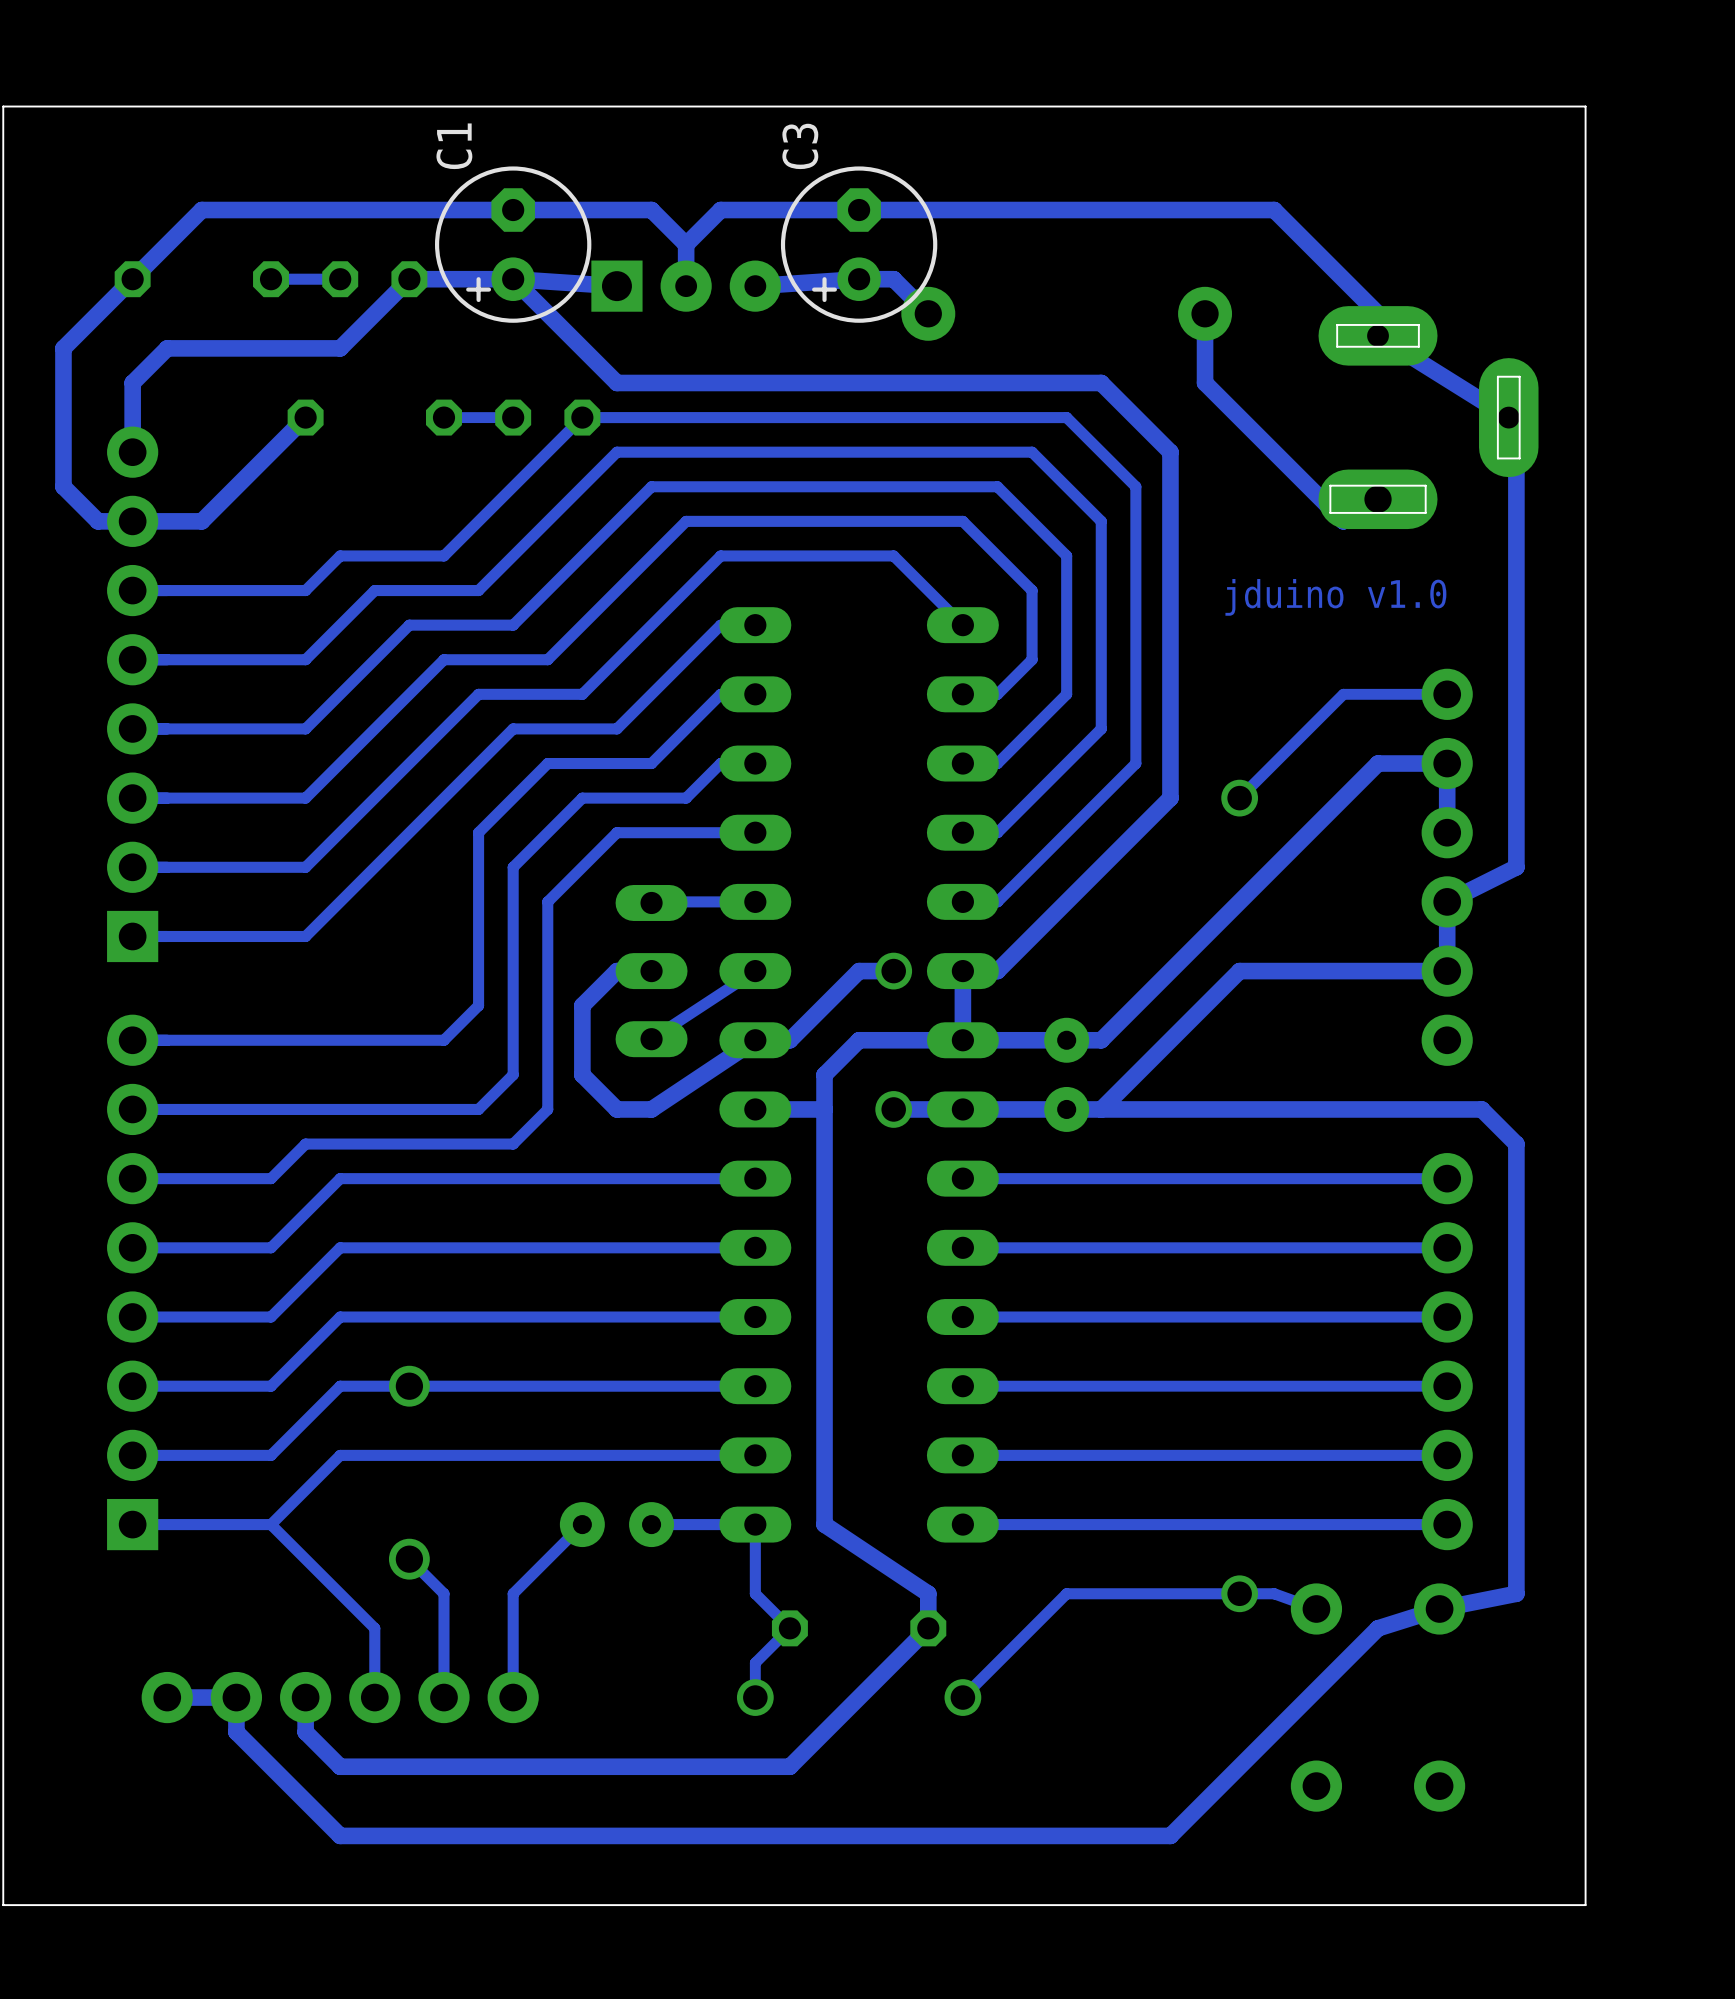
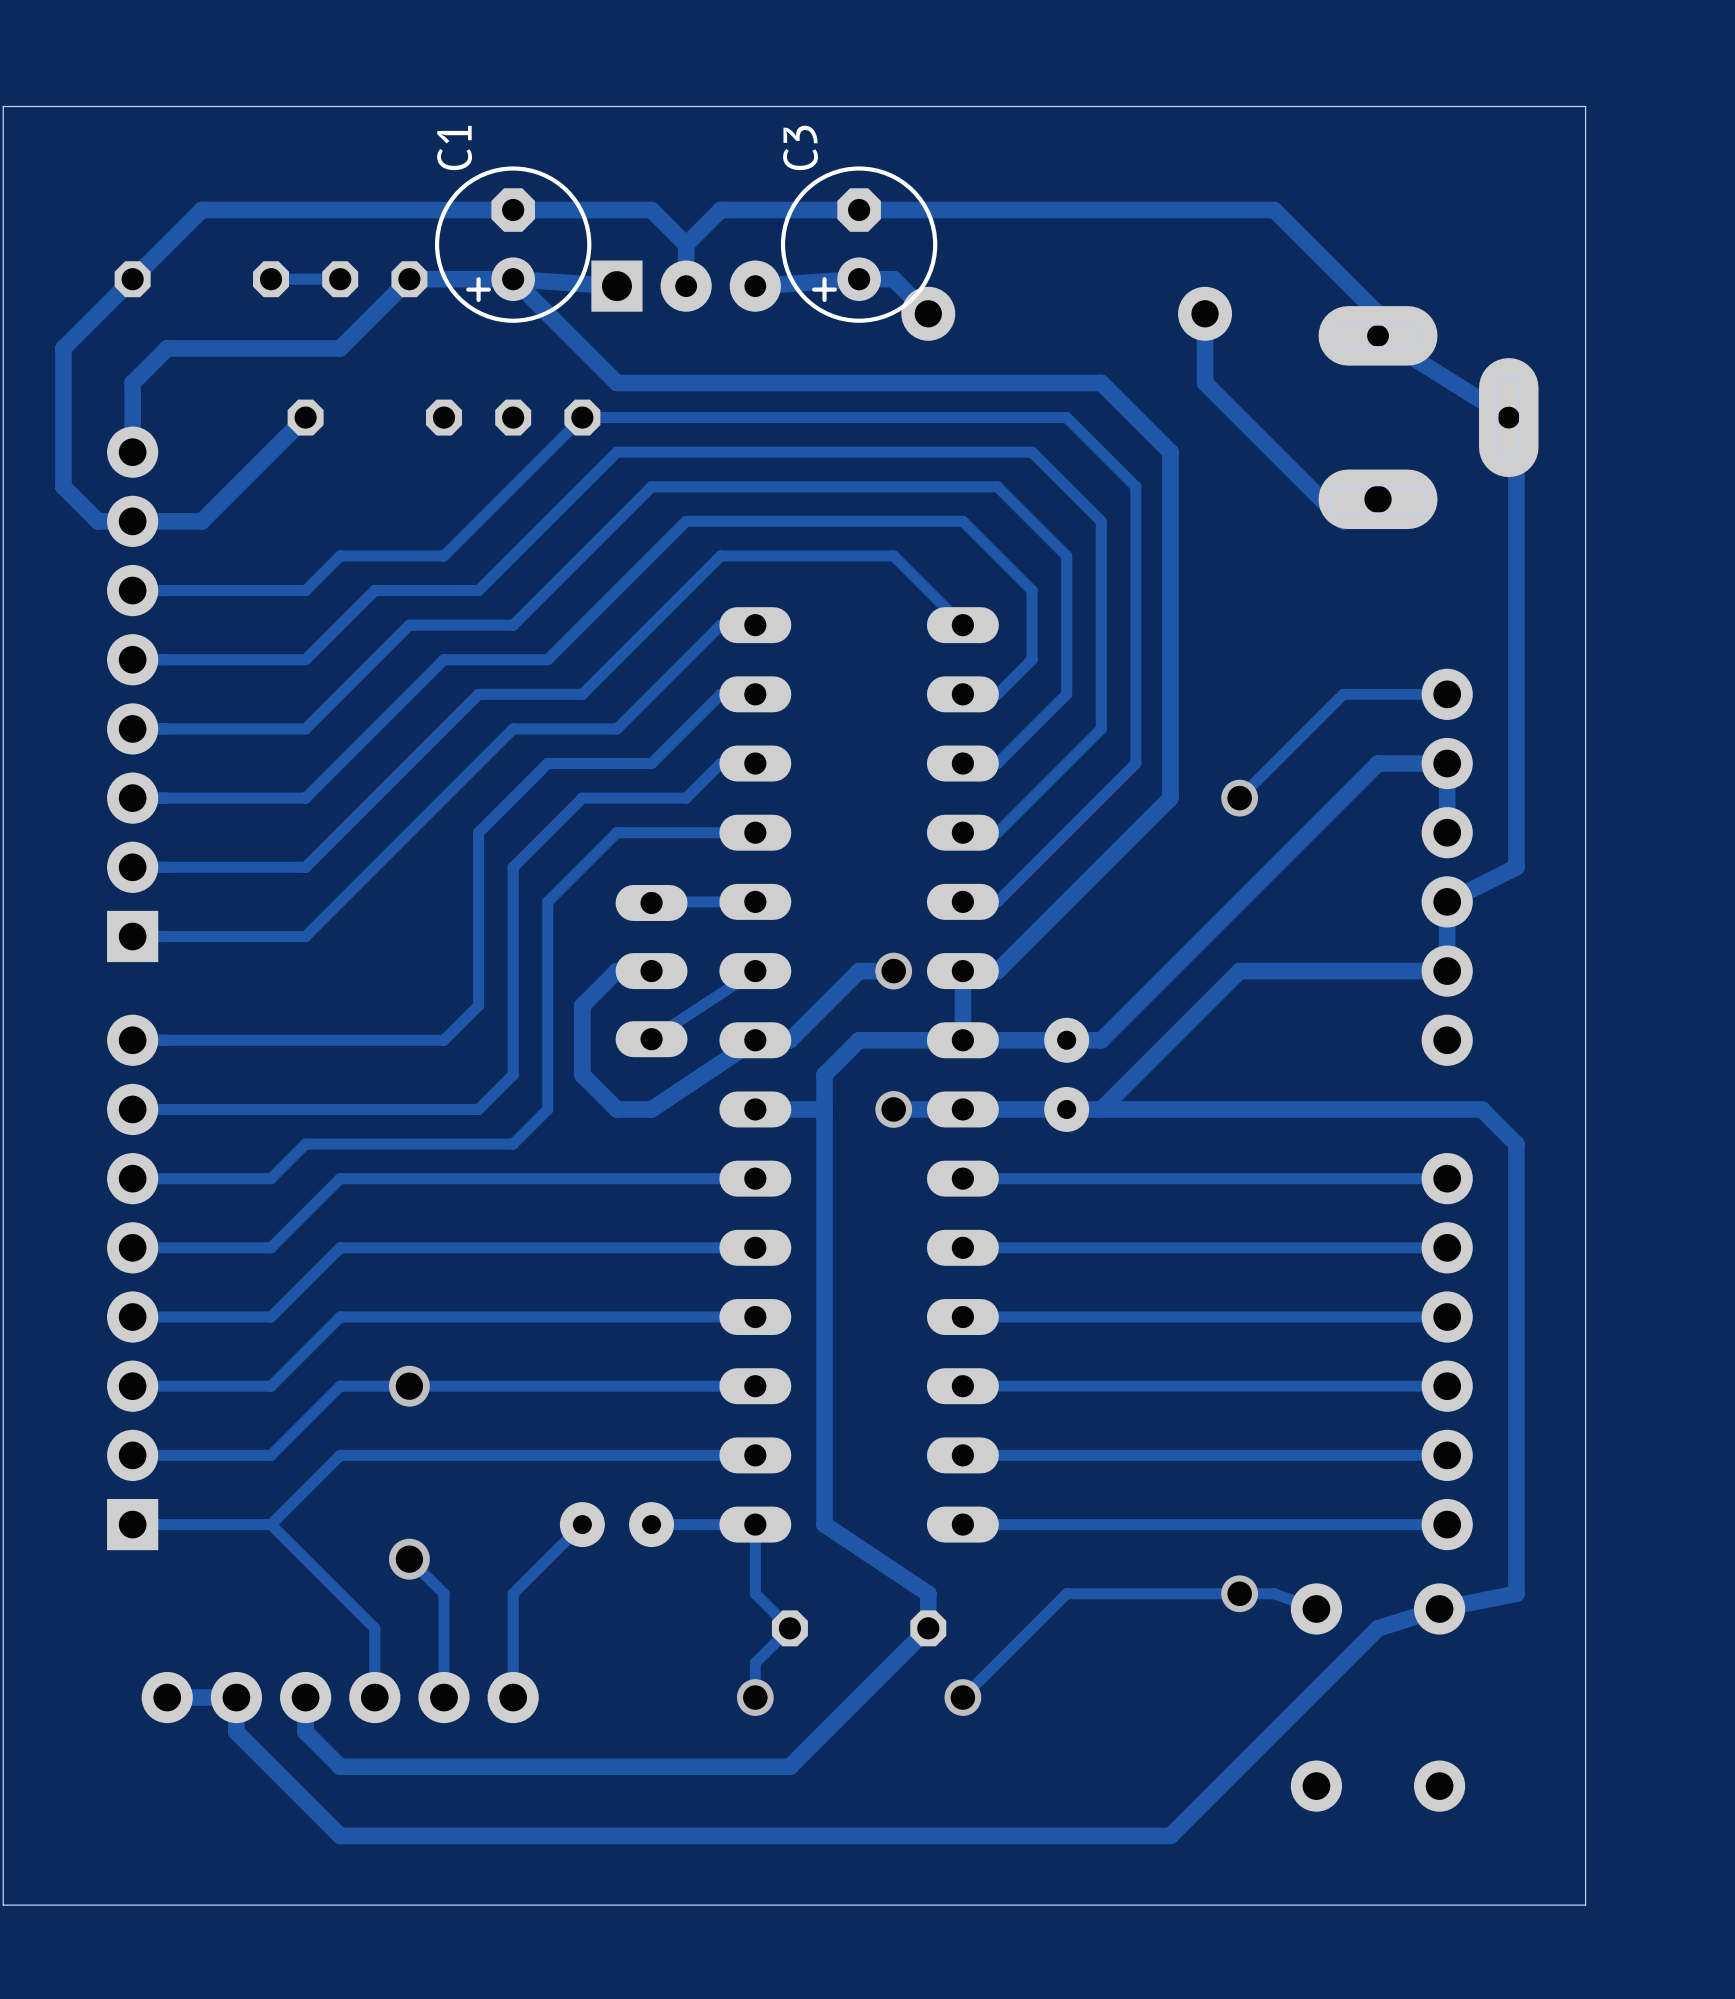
track: (513, 417) (443, 417) -> none
text: jduino v1.0 (1335, 597) -> none

